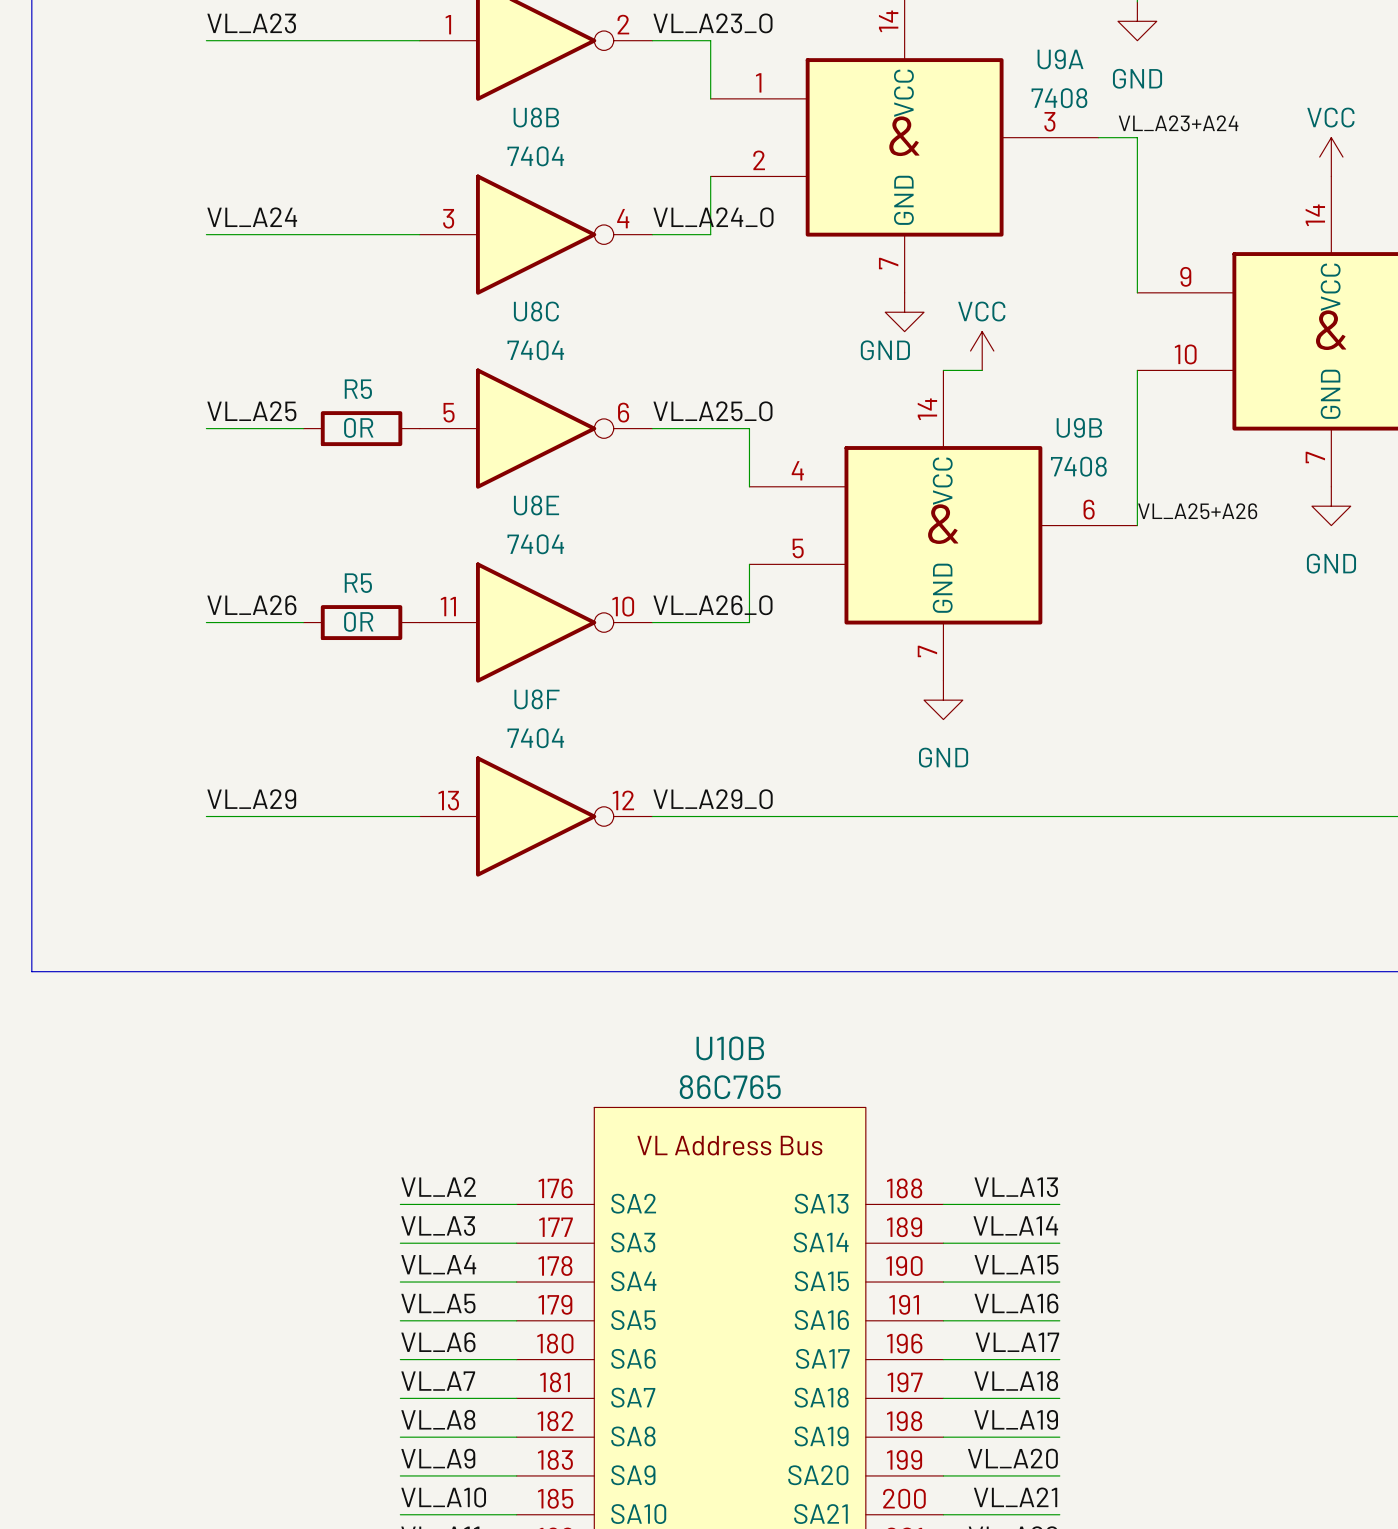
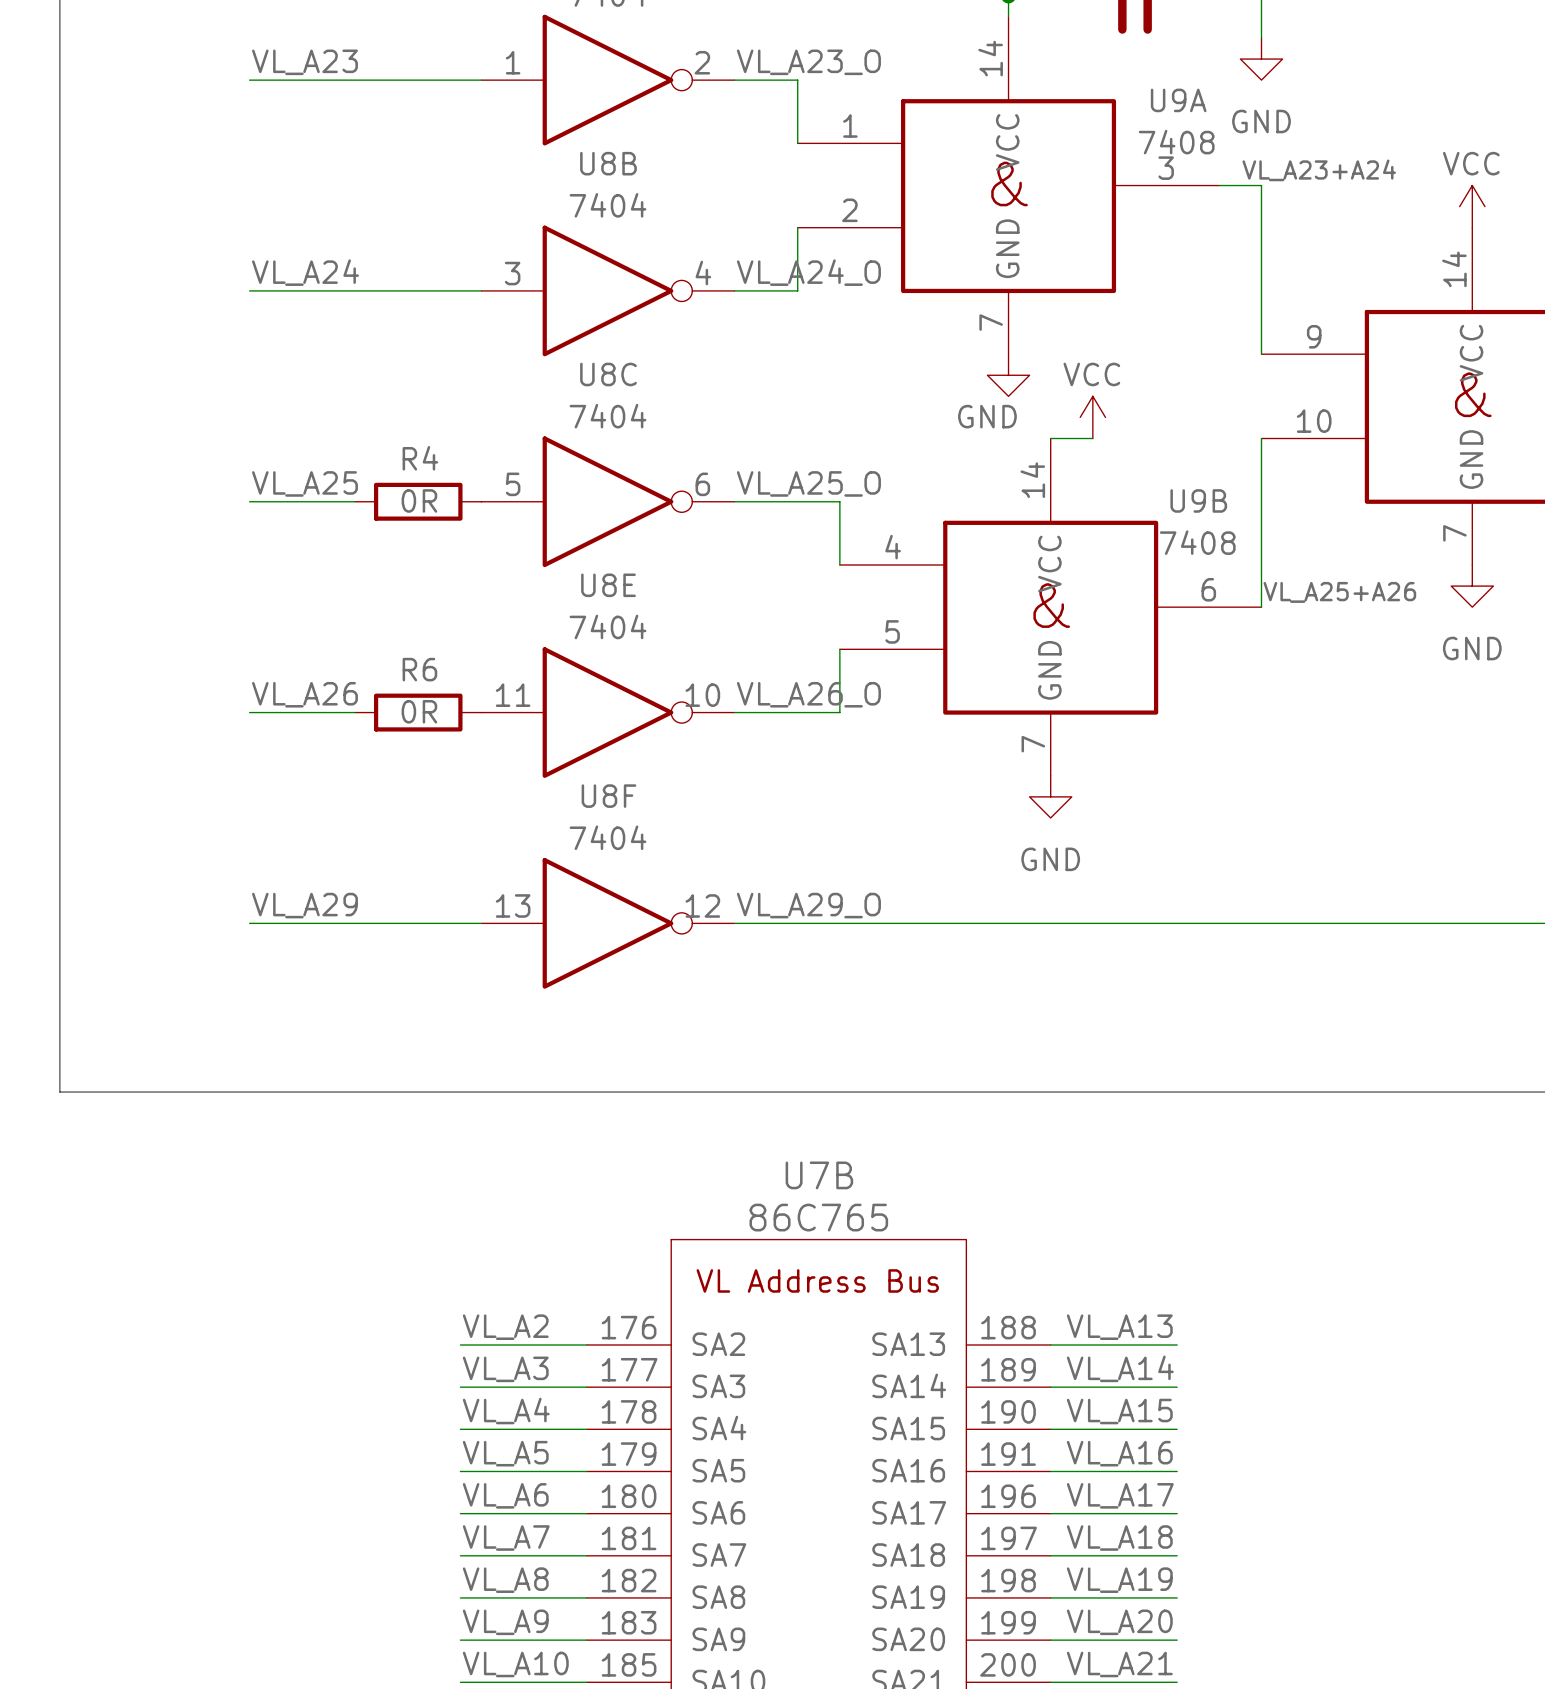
R5 name: R5 (358, 389) -> R4 (420, 458)
R5 name: R5 (358, 583) -> R6 (419, 669)
U10B name: U10B (730, 1048) -> U7B (819, 1175)

